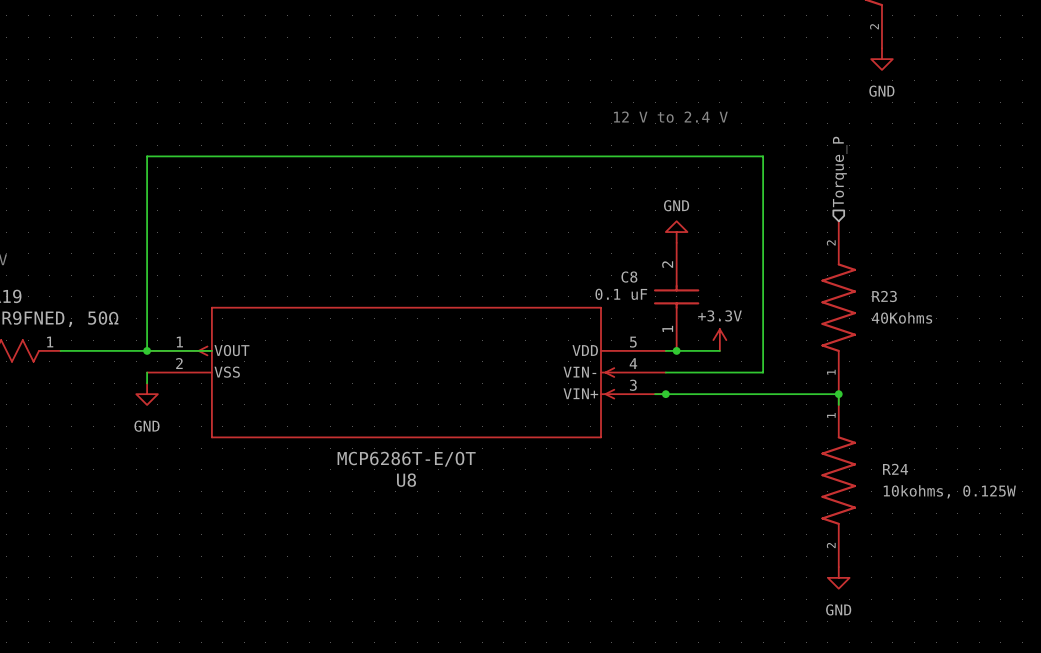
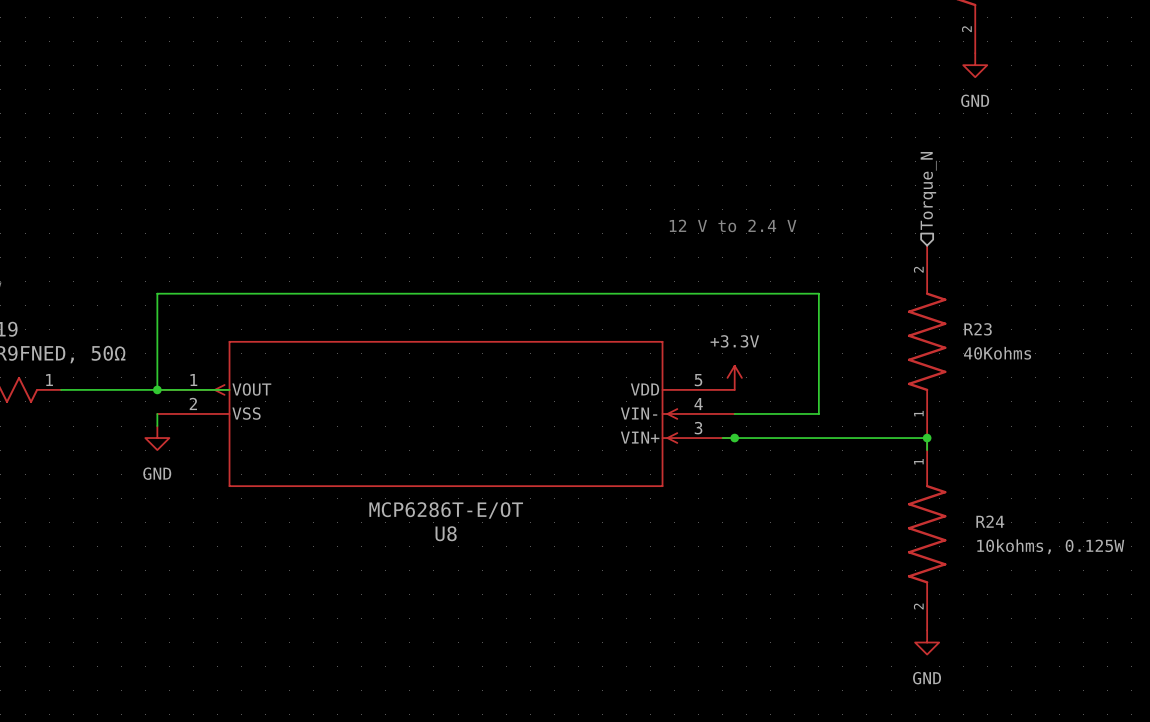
text position: 12 V to 2.4 V (670, 117) -> 12 V to 2.4 V (733, 225)
hierarchical label: Torque_P (840, 171) -> Torque_N (928, 190)
power symbol: GND (676, 232) -> none
wire: (147, 264) (147, 156) (763, 156) (763, 372) (741, 372) -> (157, 293) (818, 293) (818, 413)
C8: 0.1 uF (676, 296) -> none
power symbol text position: +3.3V (719, 315) -> +3.3V (734, 341)
power symbol position: +3.3V (719, 340) -> +3.3V (734, 377)
wire: (665, 350) (719, 350) -> none
junction: (676, 350) -> none

